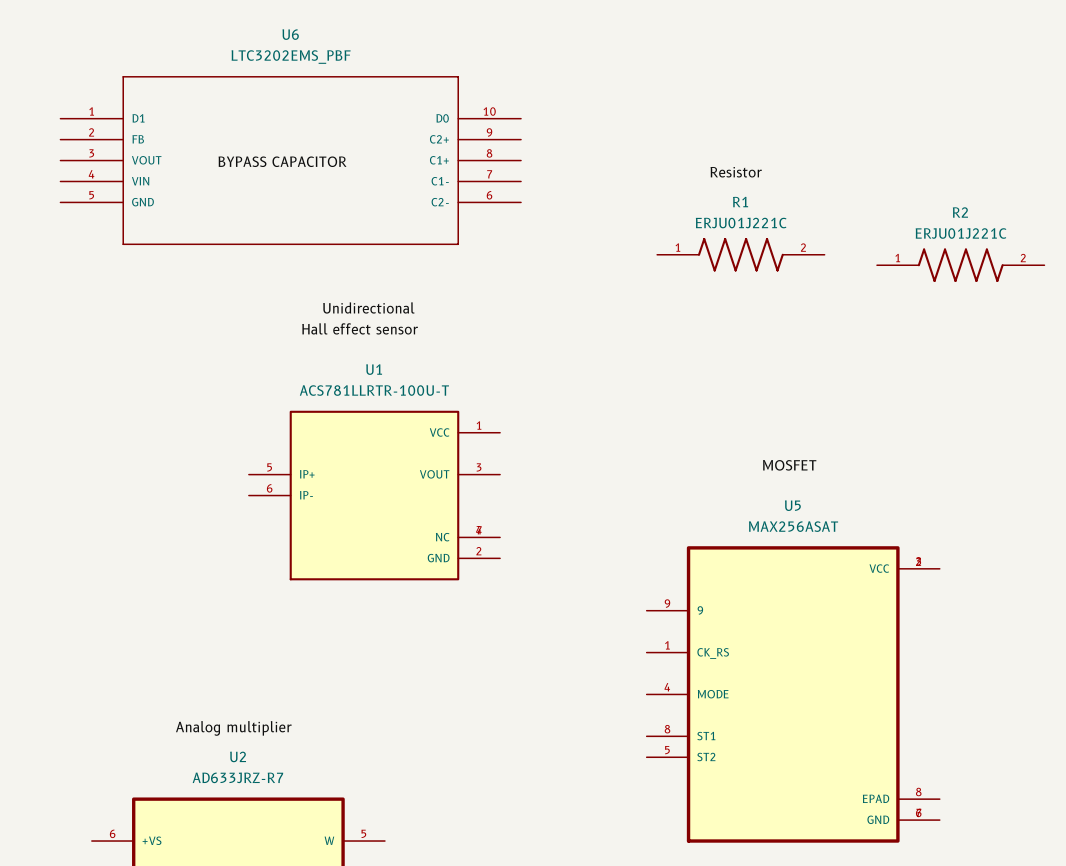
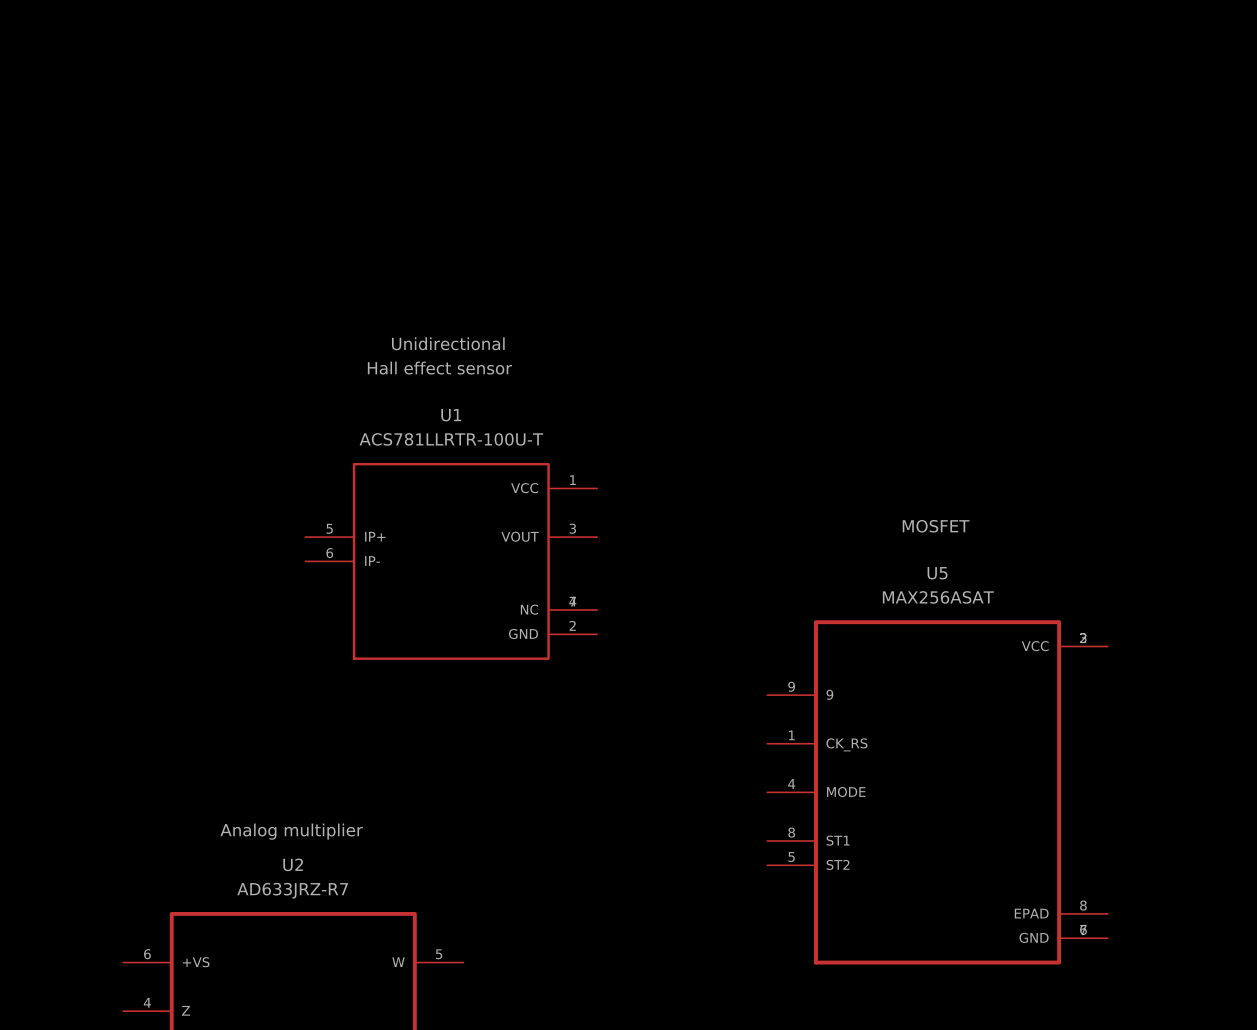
U6: LTC3202EMS_PBF (290, 160) -> none
label: BYPASS CAPACITOR (282, 161) -> none
label: Resistor (736, 172) -> none
R1: ERJU01J221C (740, 254) -> none
R2: ERJU01J221C (960, 265) -> none

